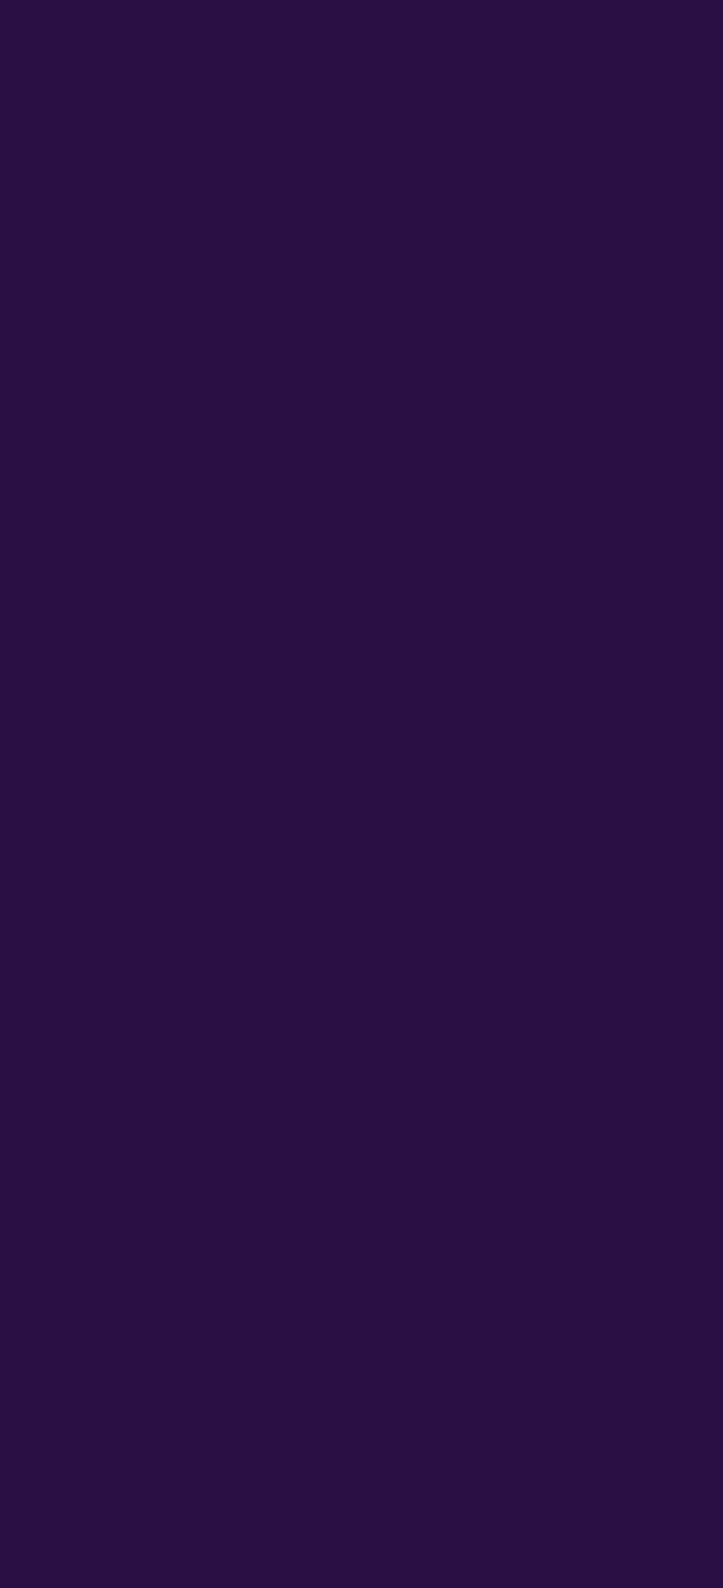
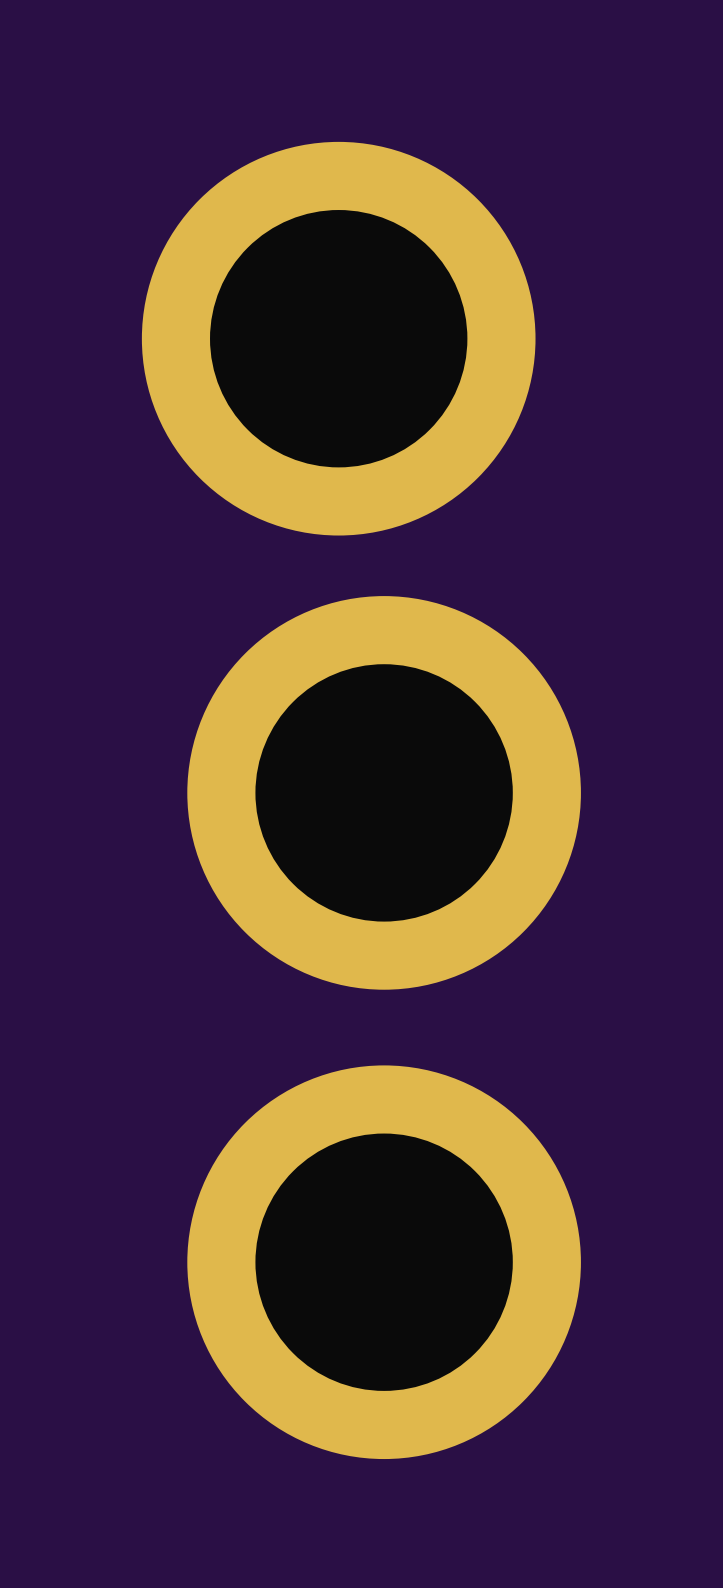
part: none -> (338, 338)
part: none -> (384, 792)
part: none -> (384, 1262)

